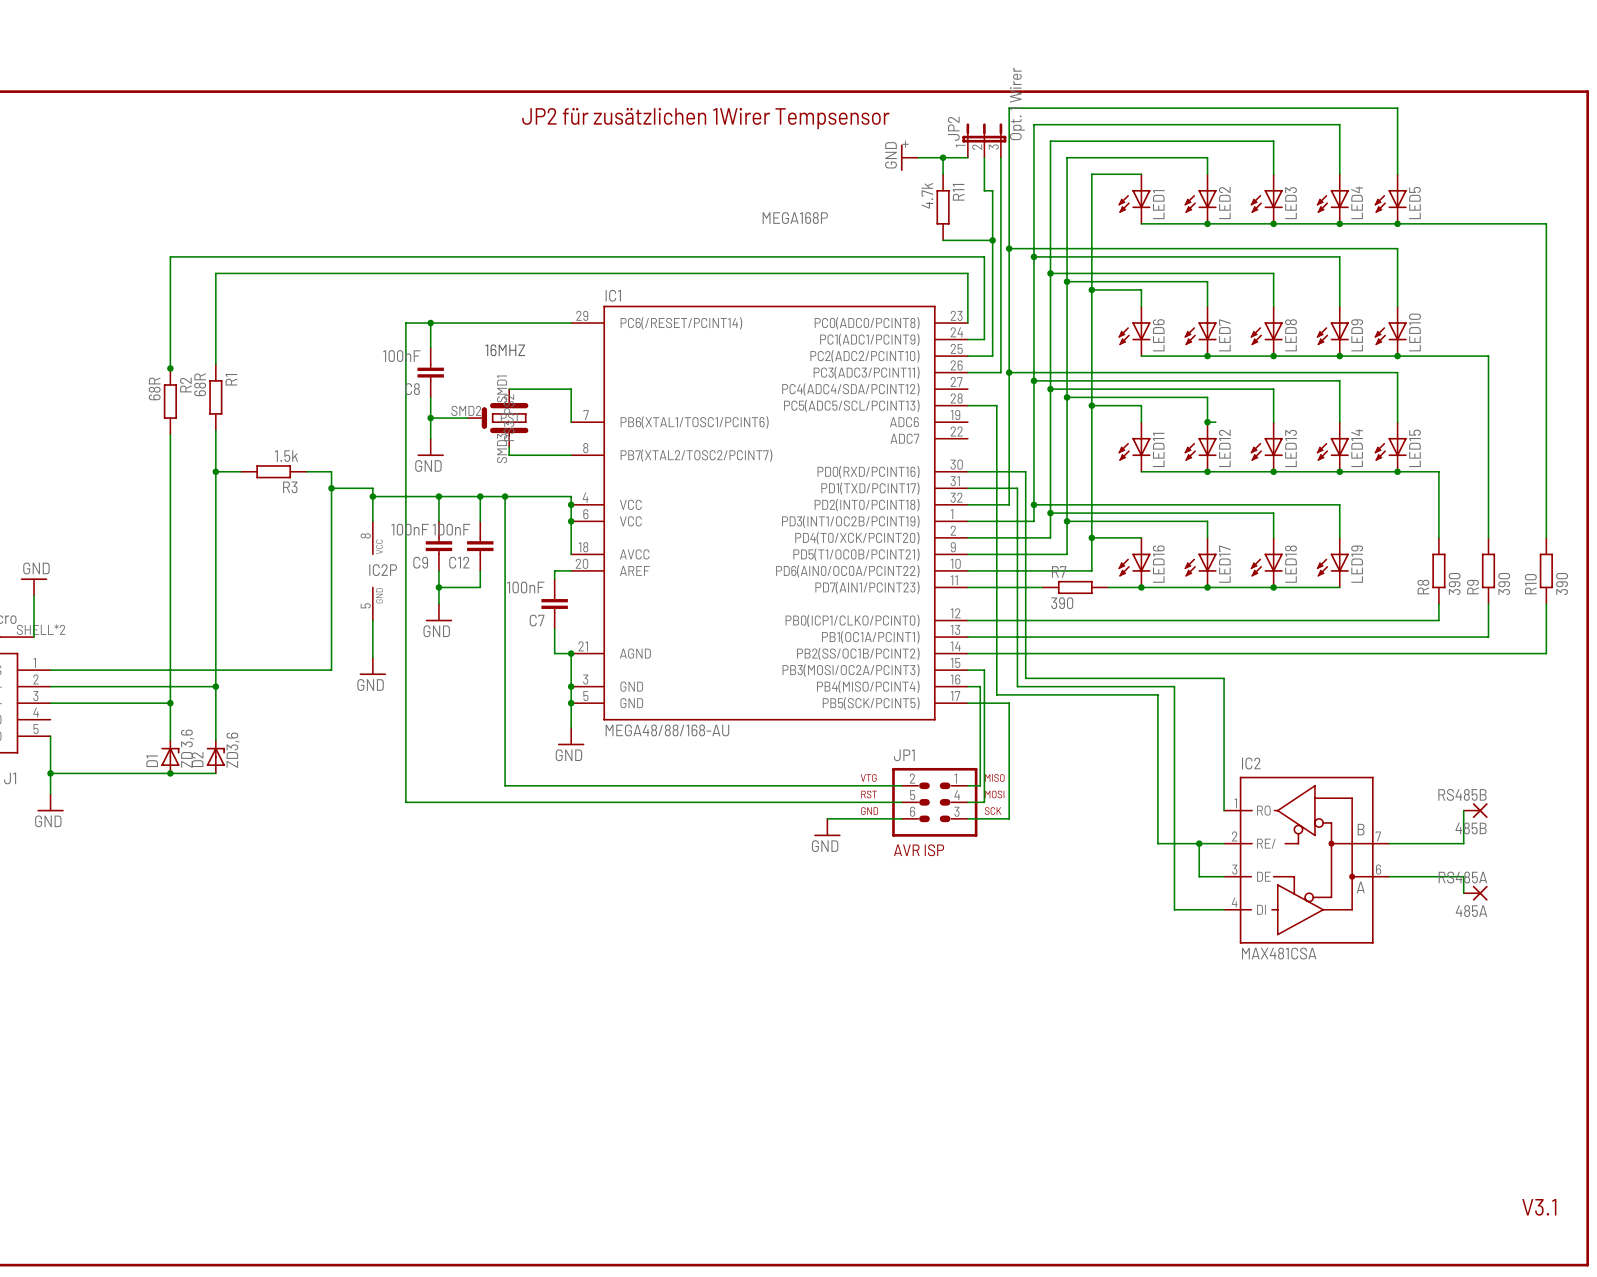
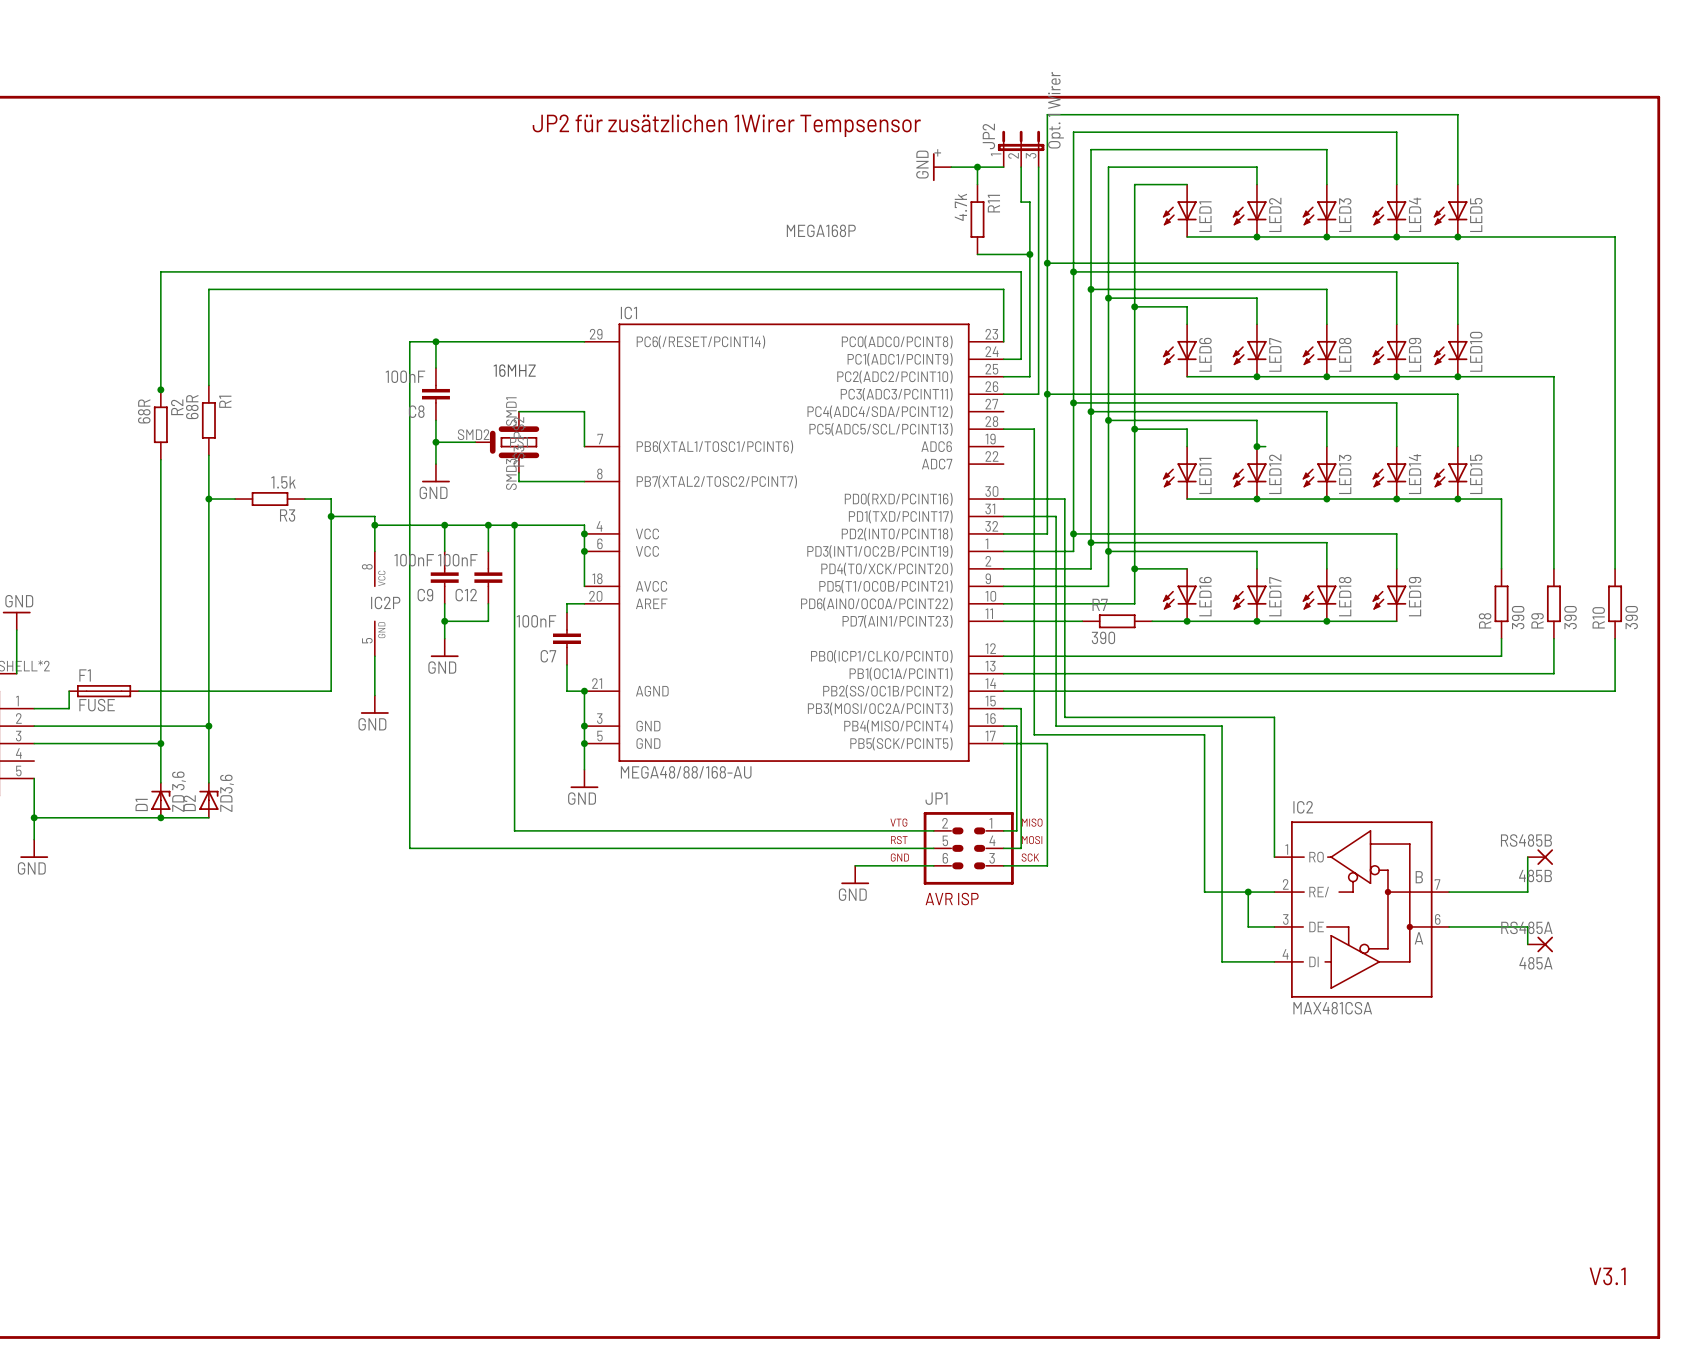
wire: none -> (69, 691) (69, 708)
F1: none -> FUSE (104, 691)
wire: (331, 653) (331, 670) (83, 670) -> (331, 691) (139, 691)

